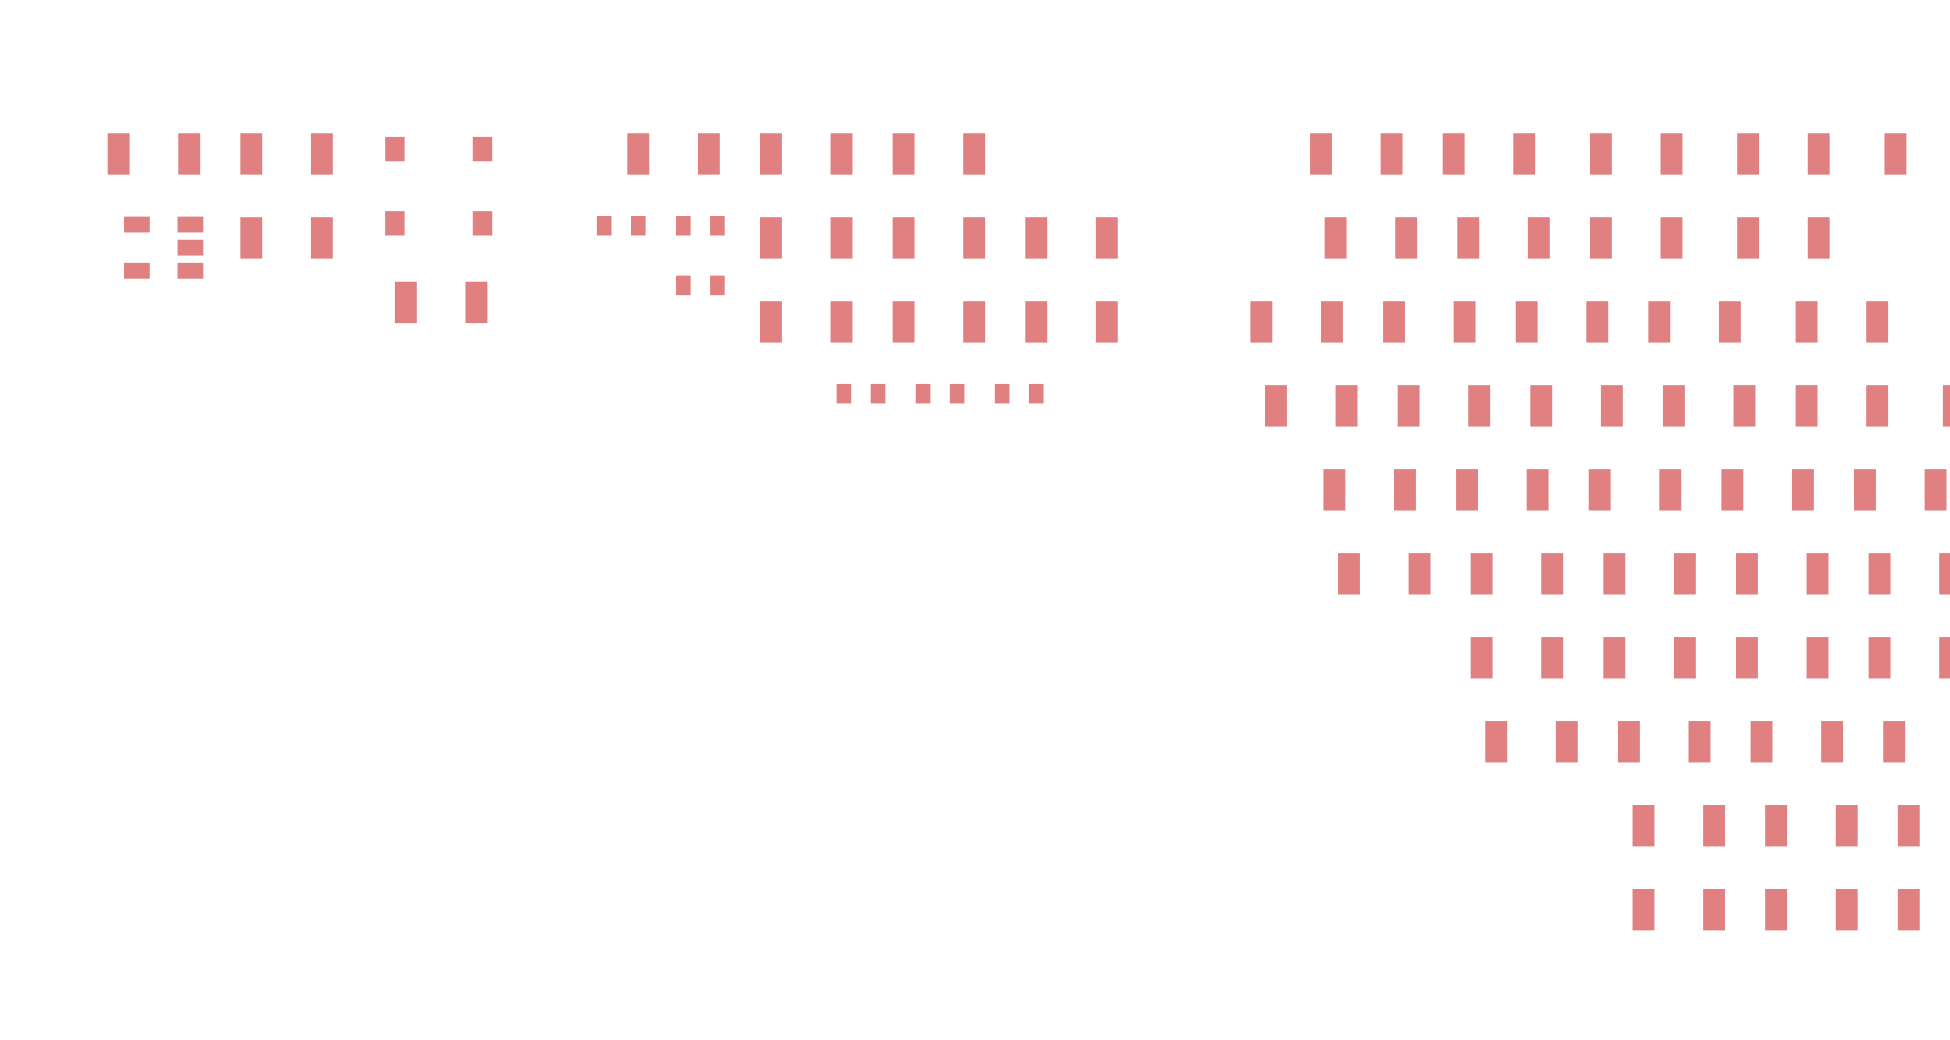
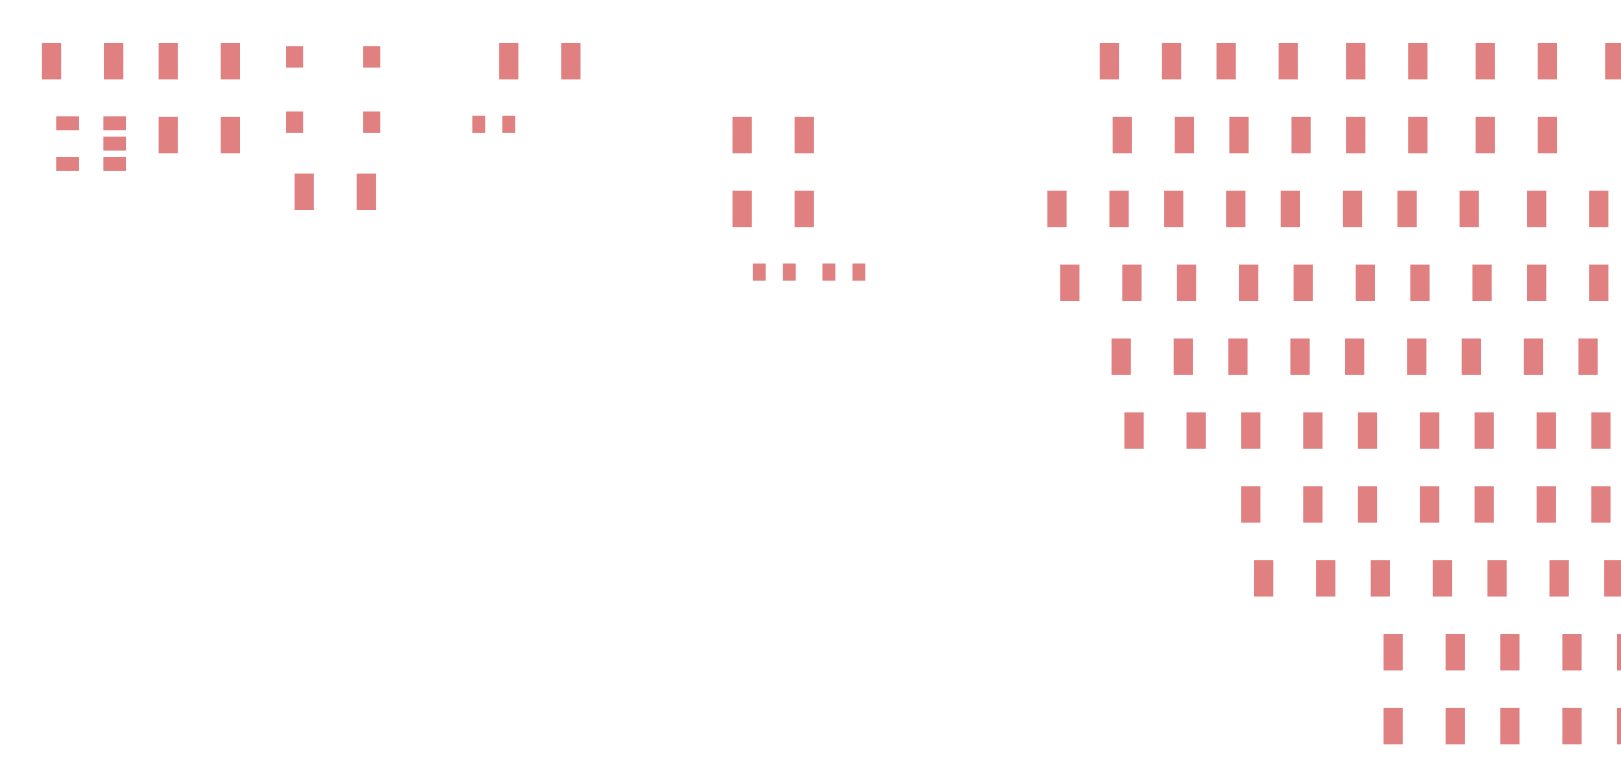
part: (806, 153) -> none
part: (938, 153) -> none
part: (700, 225) -> none
part: (806, 237) -> none
part: (1071, 237) -> none
part: (700, 285) -> none
part: (806, 321) -> none
part: (1071, 321) -> none
part: (860, 393) -> none

